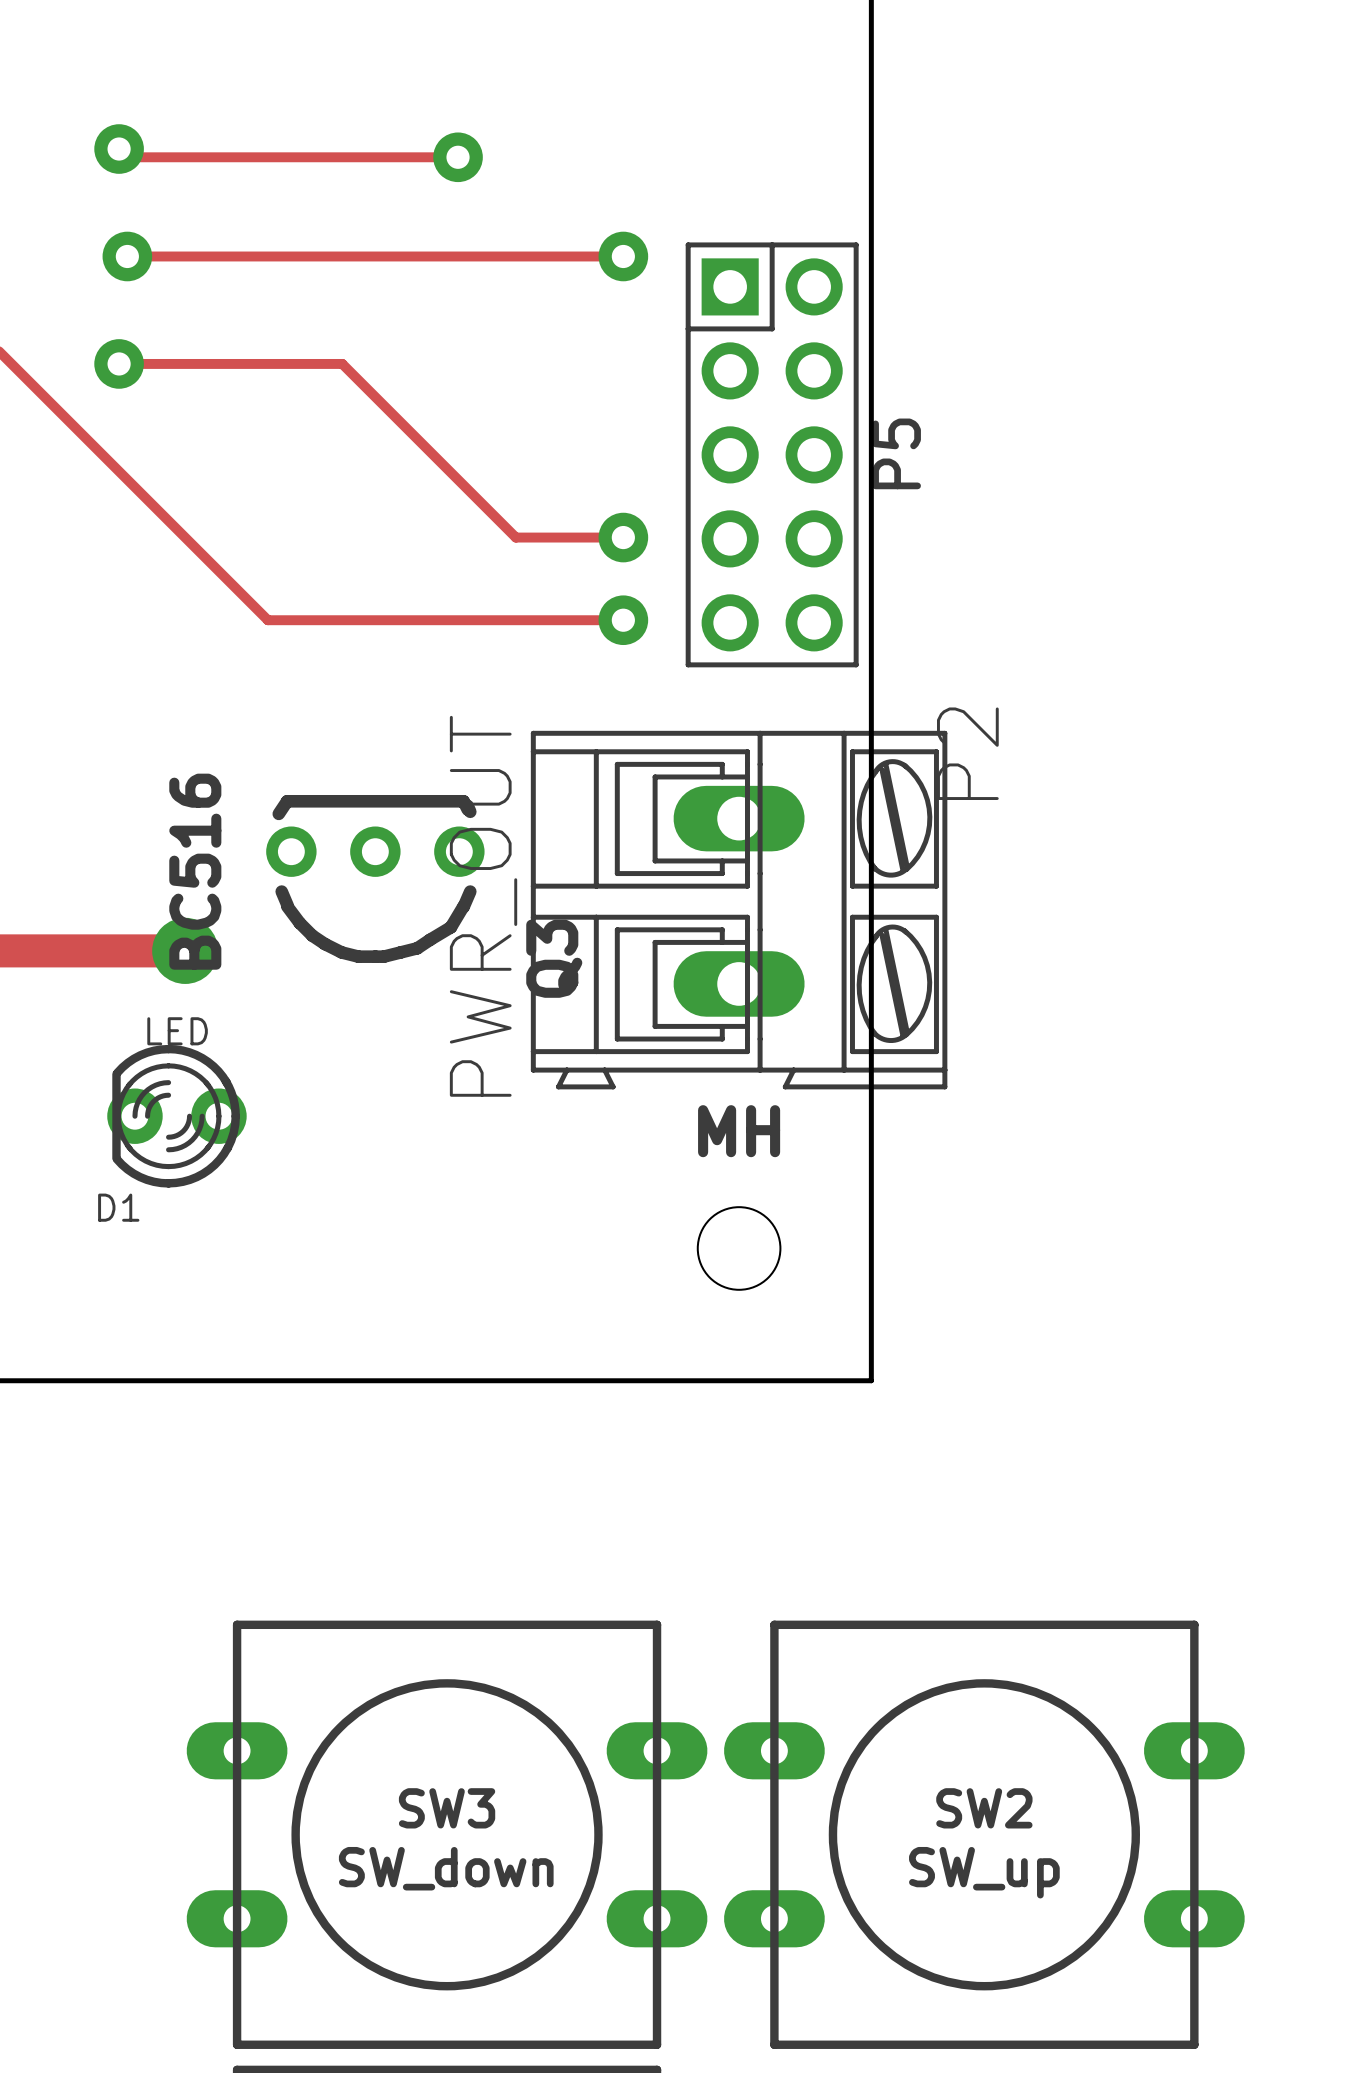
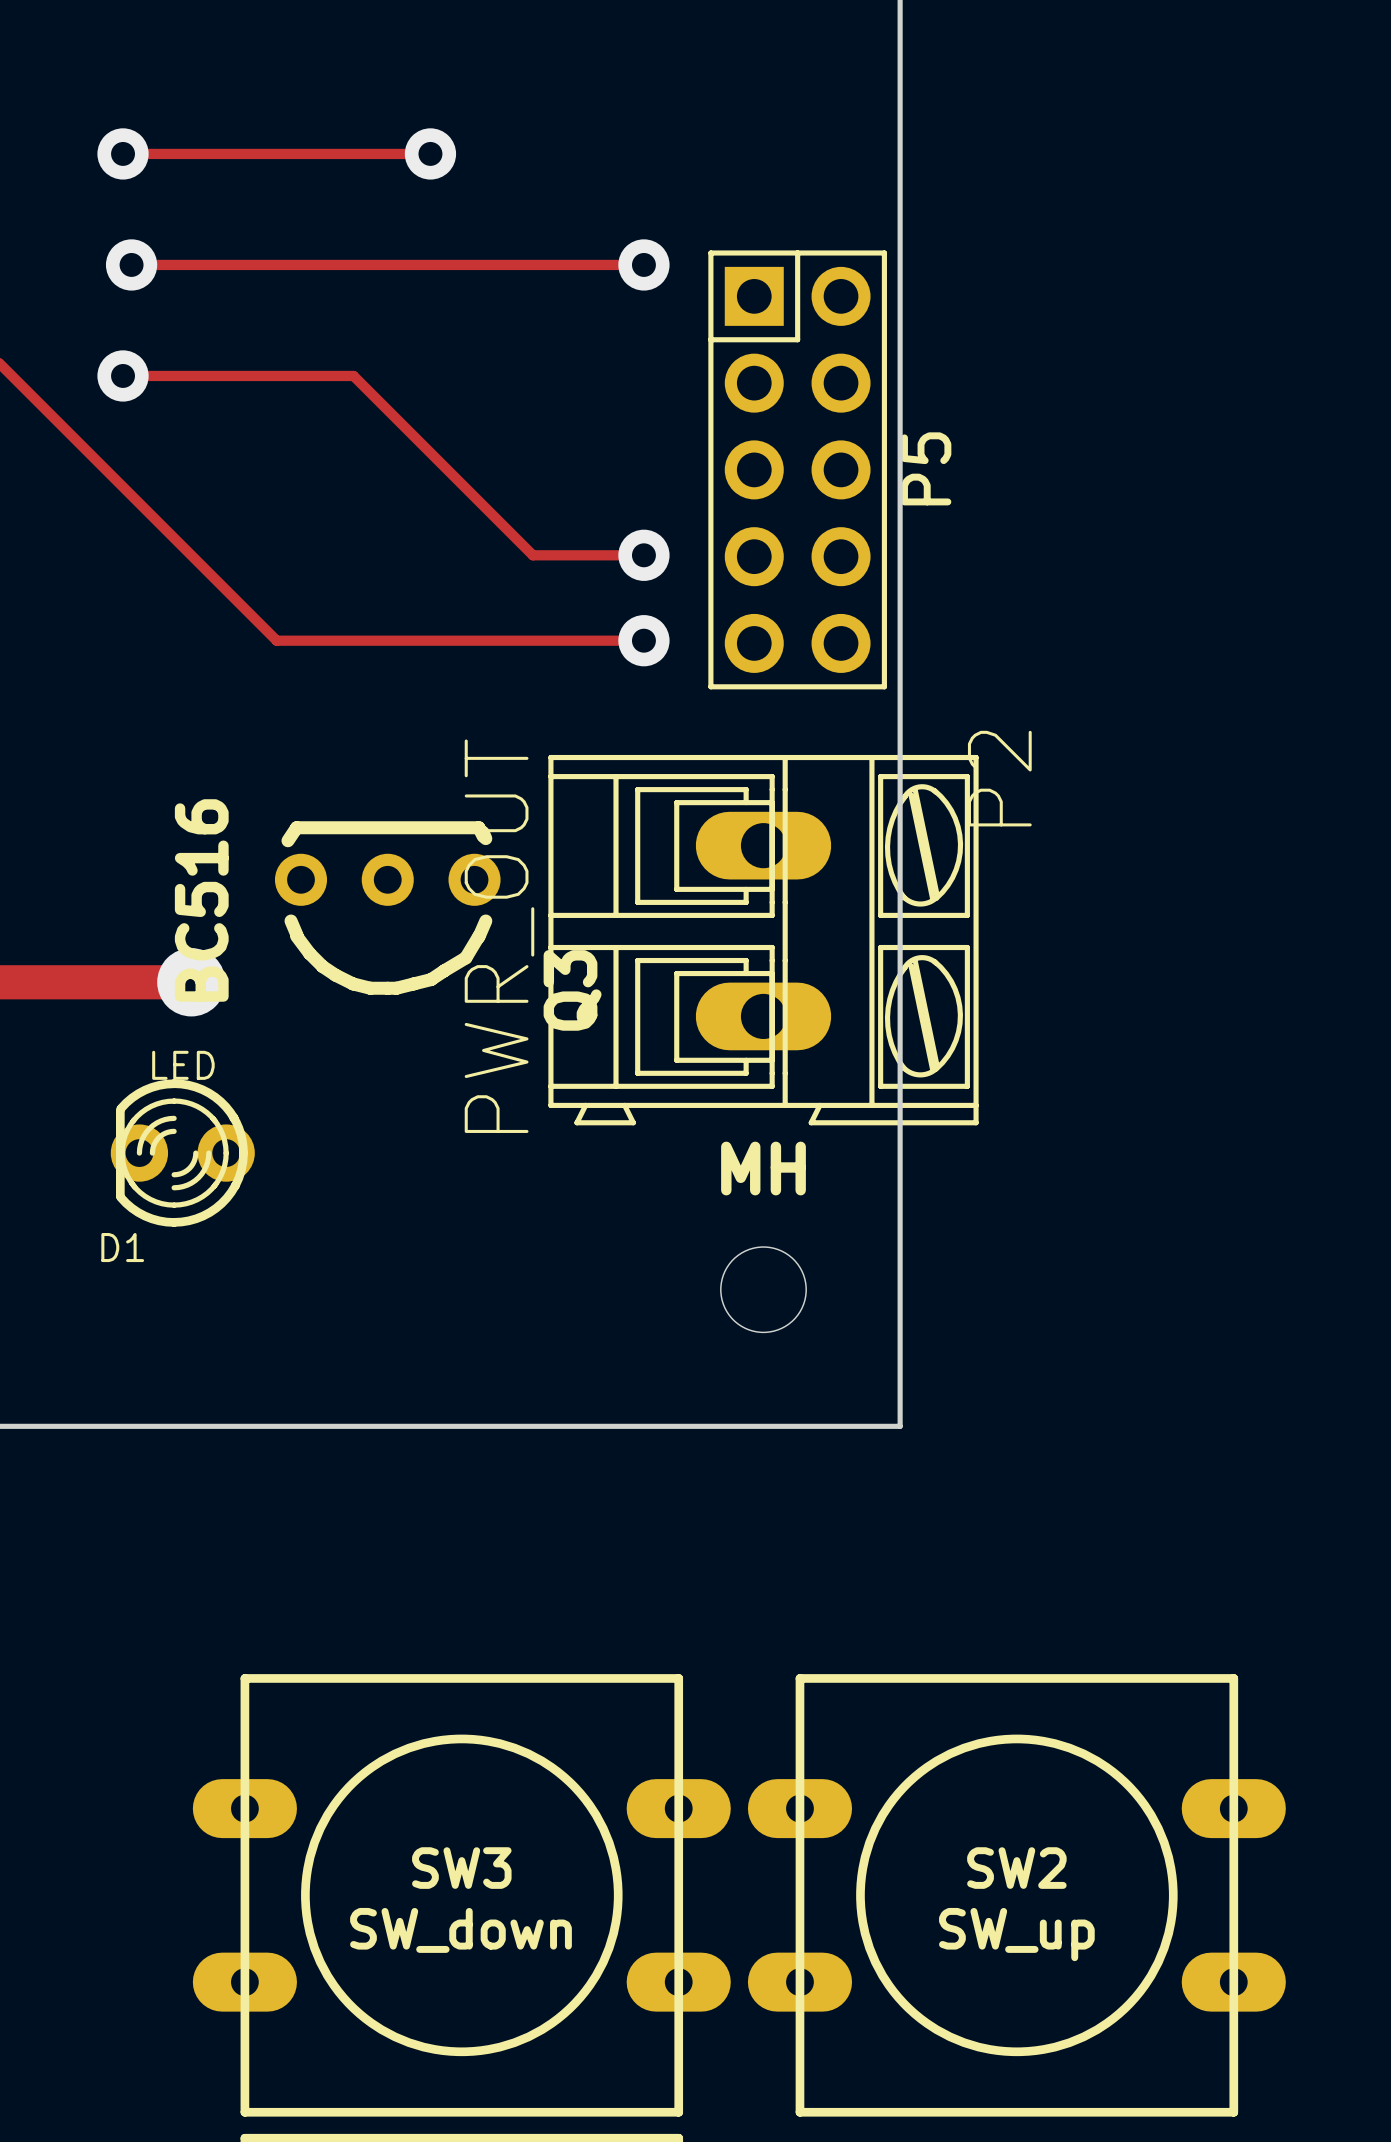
track: (119, 149) (127, 157) (458, 157) -> (123, 153) (430, 153)
via position: (458, 157) -> (430, 153)

